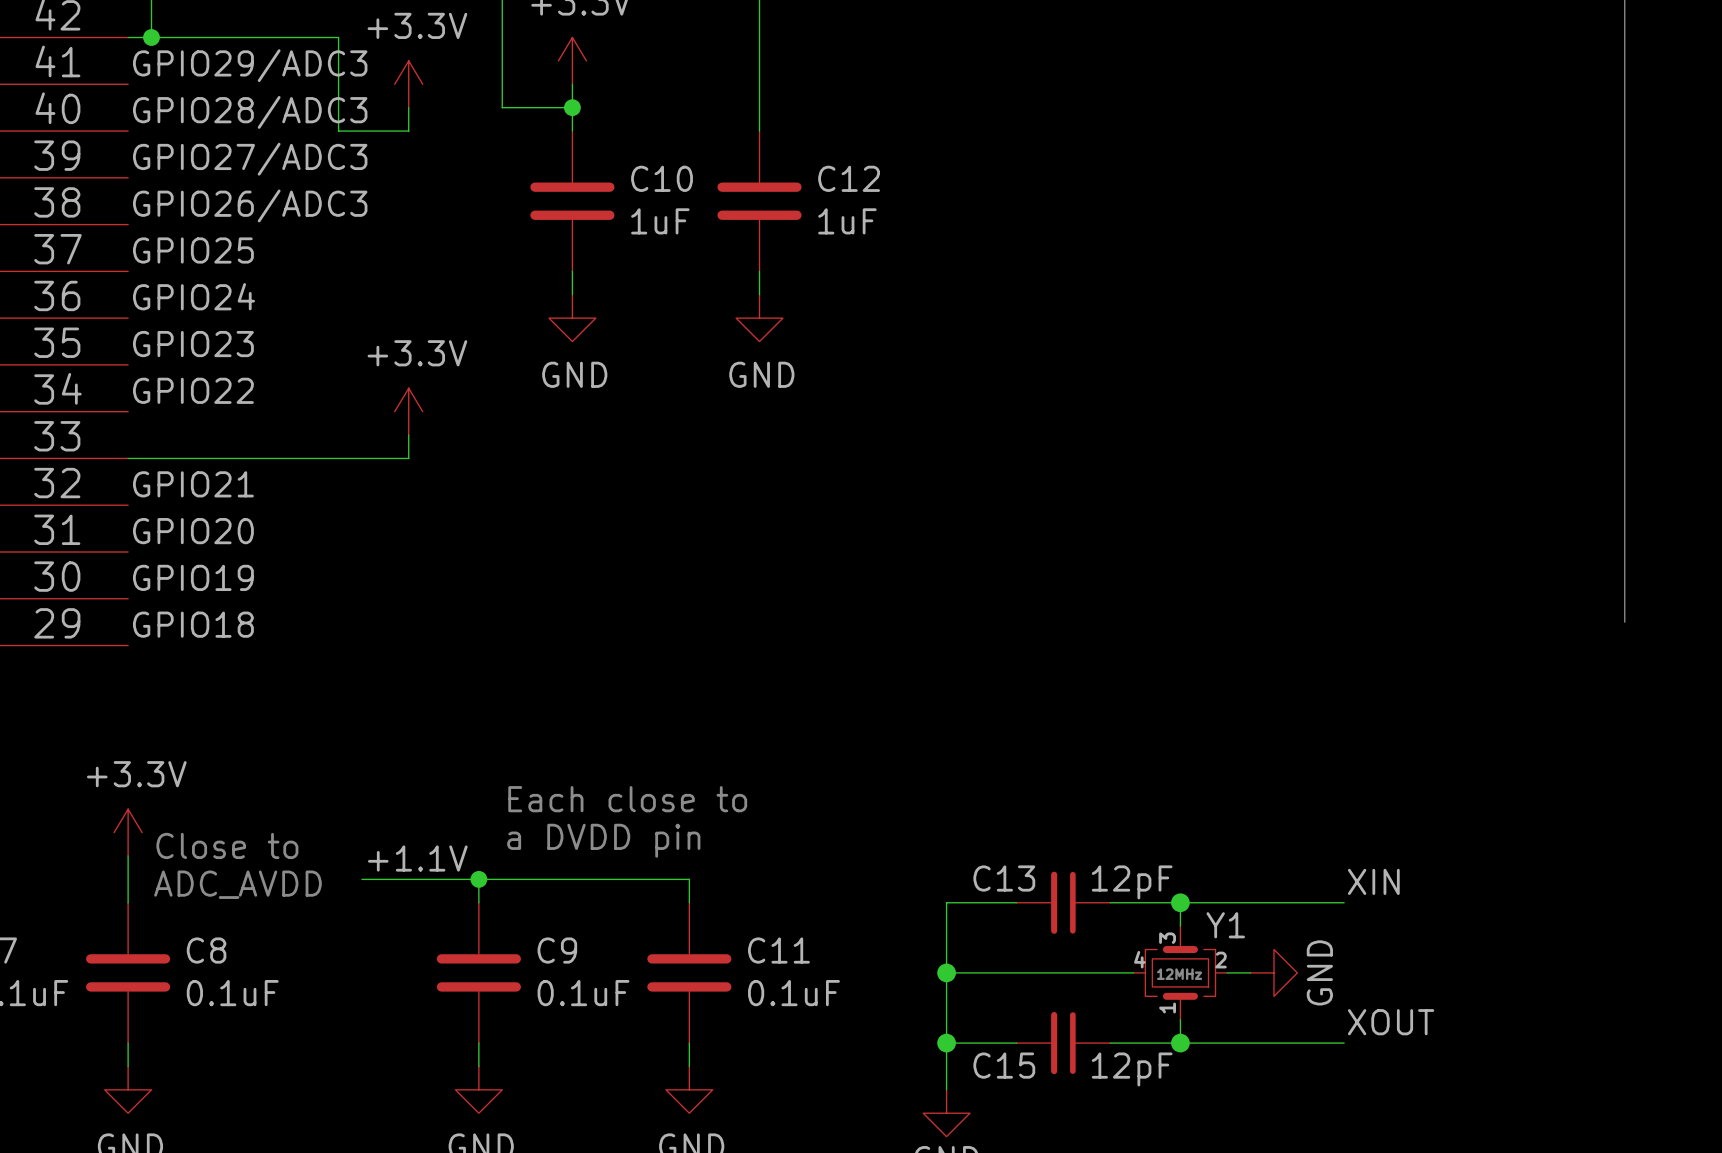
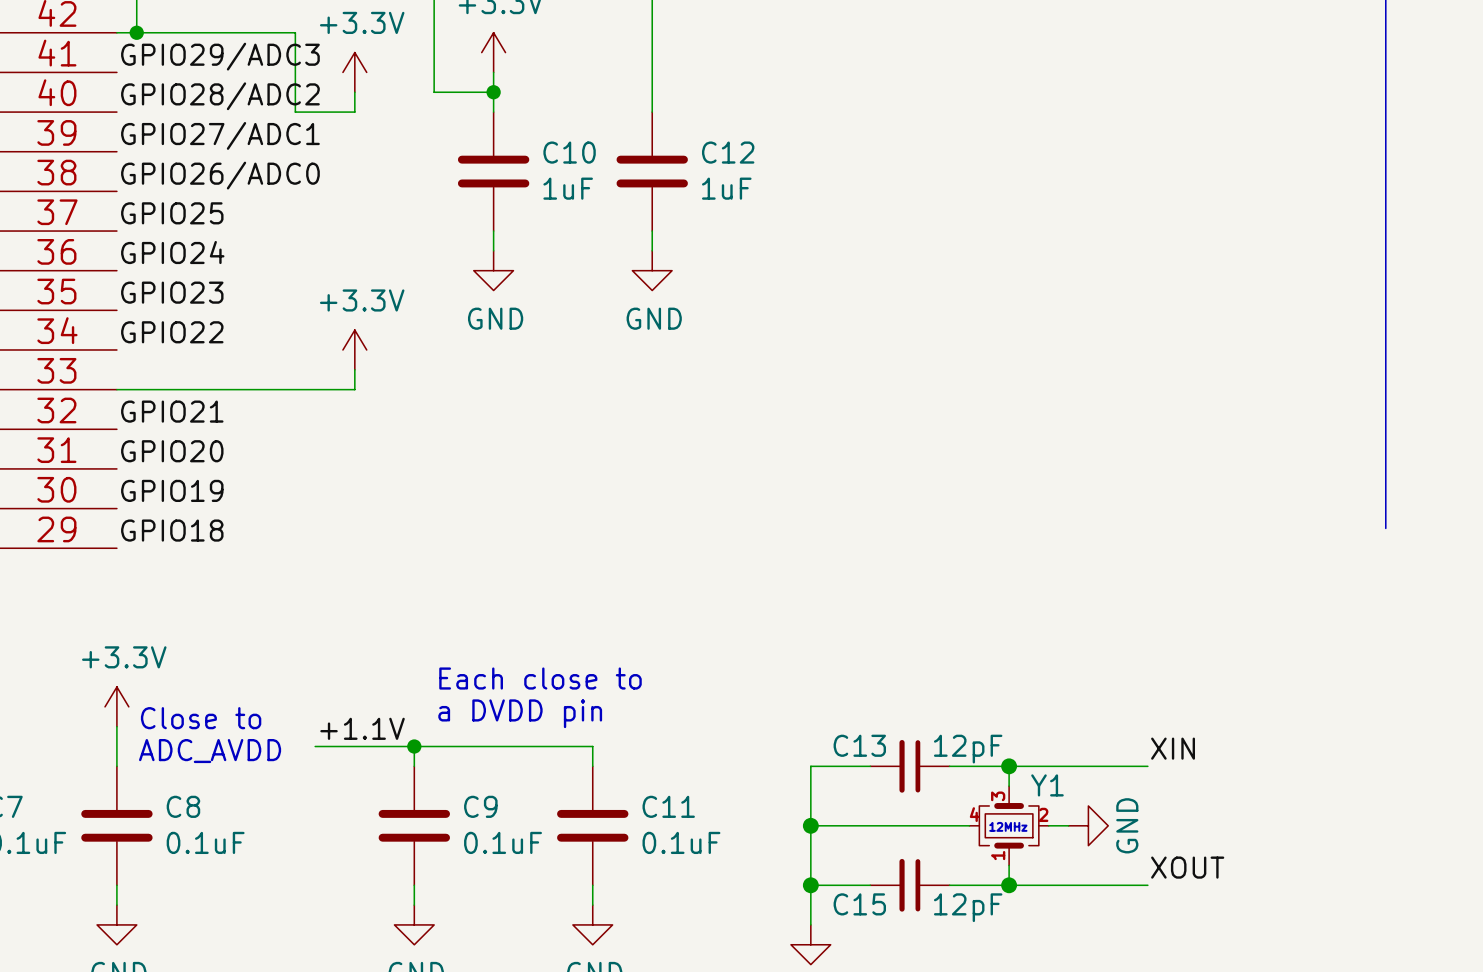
label: GPIO28/ADC3 (250, 112) -> GPIO28/ADC2 (220, 96)
label: GPIO27/ADC3 (250, 159) -> GPIO27/ADC1 (220, 135)
label: GPIO26/ADC3 (250, 205) -> GPIO26/ADC0 (220, 175)

